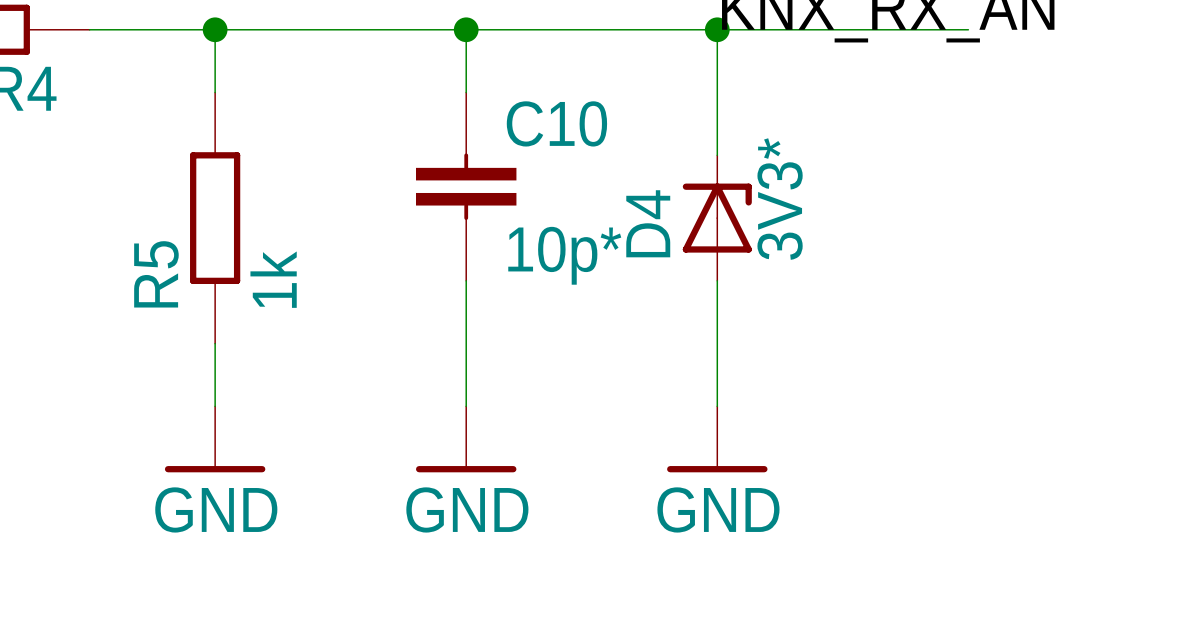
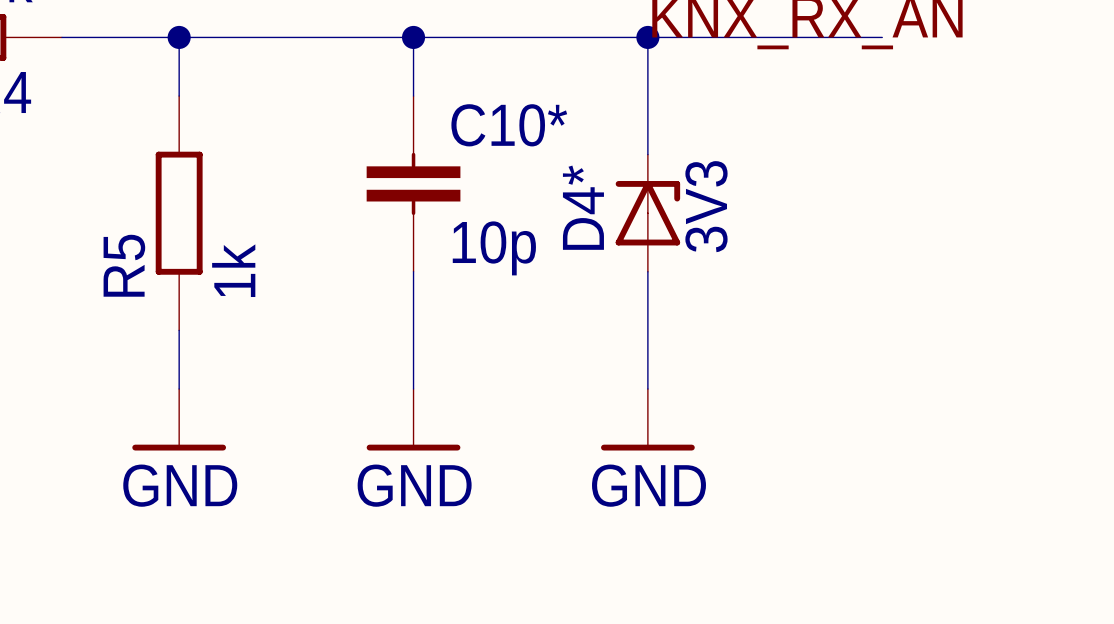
C10 name: C10 (556, 123) -> C10* (509, 125)
D4 value: 3V3* (780, 199) -> 3V3 (706, 206)
D4 name: D4 (648, 223) -> D4* (583, 207)
C10 value: 10p* (564, 255) -> 10p (494, 248)

